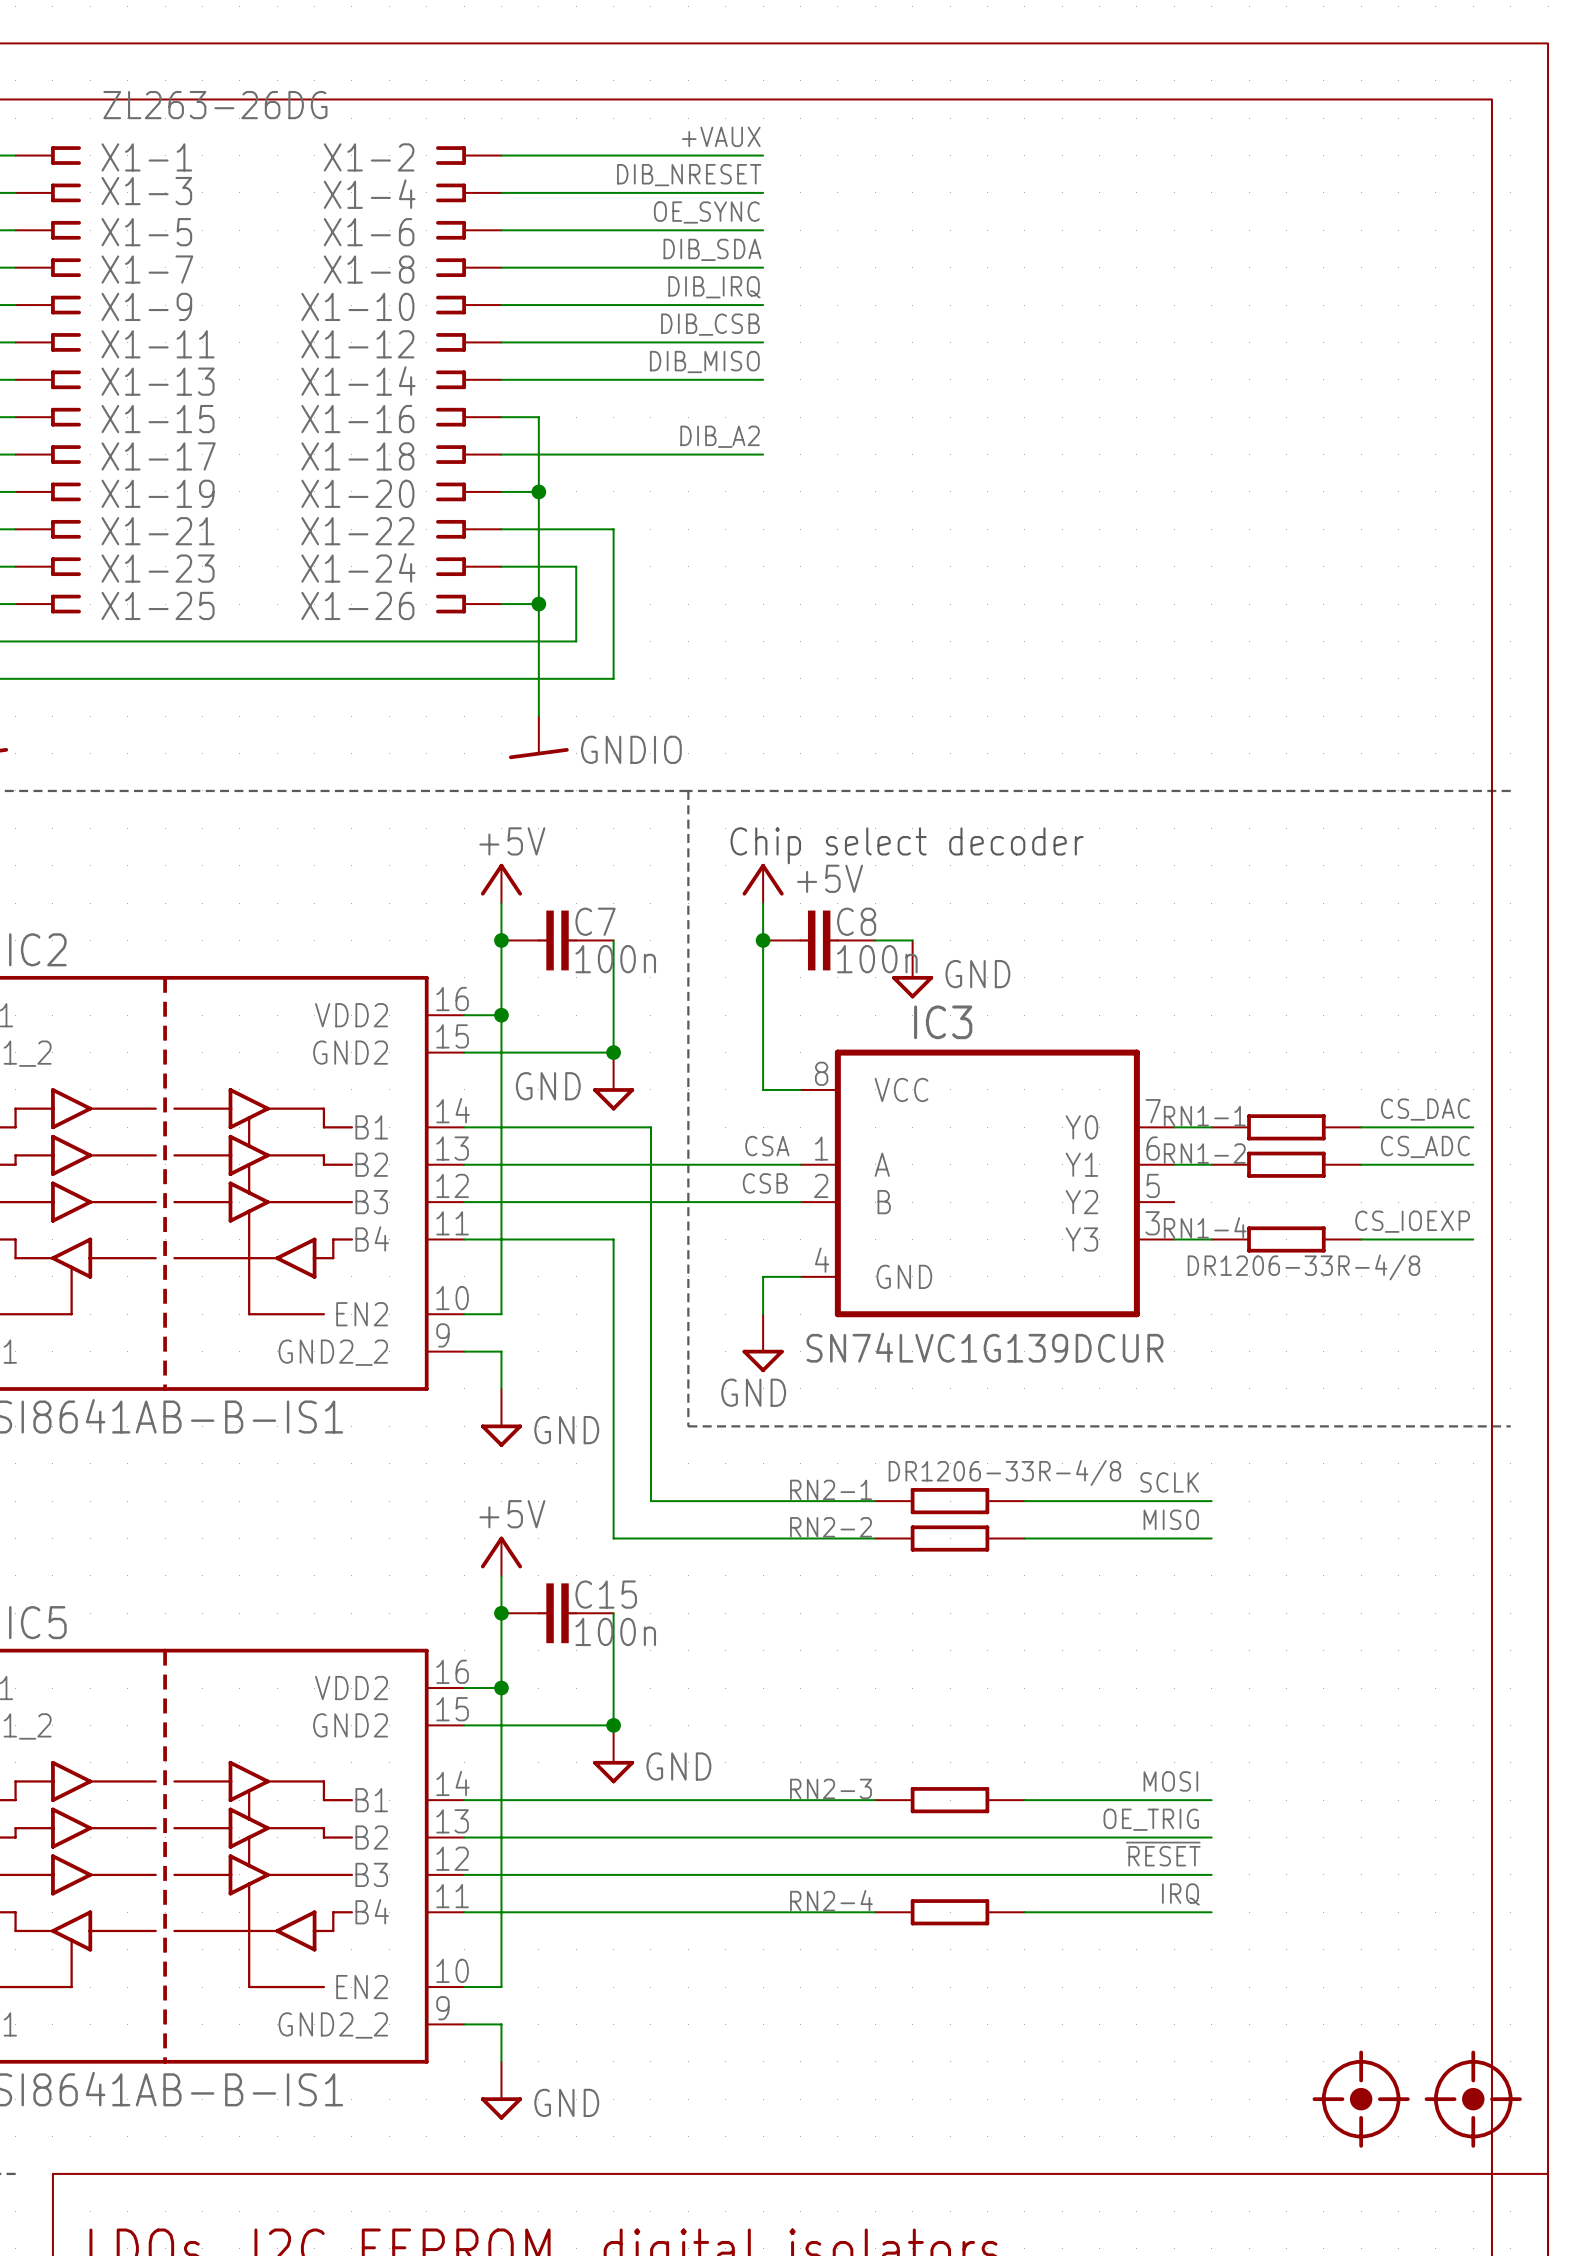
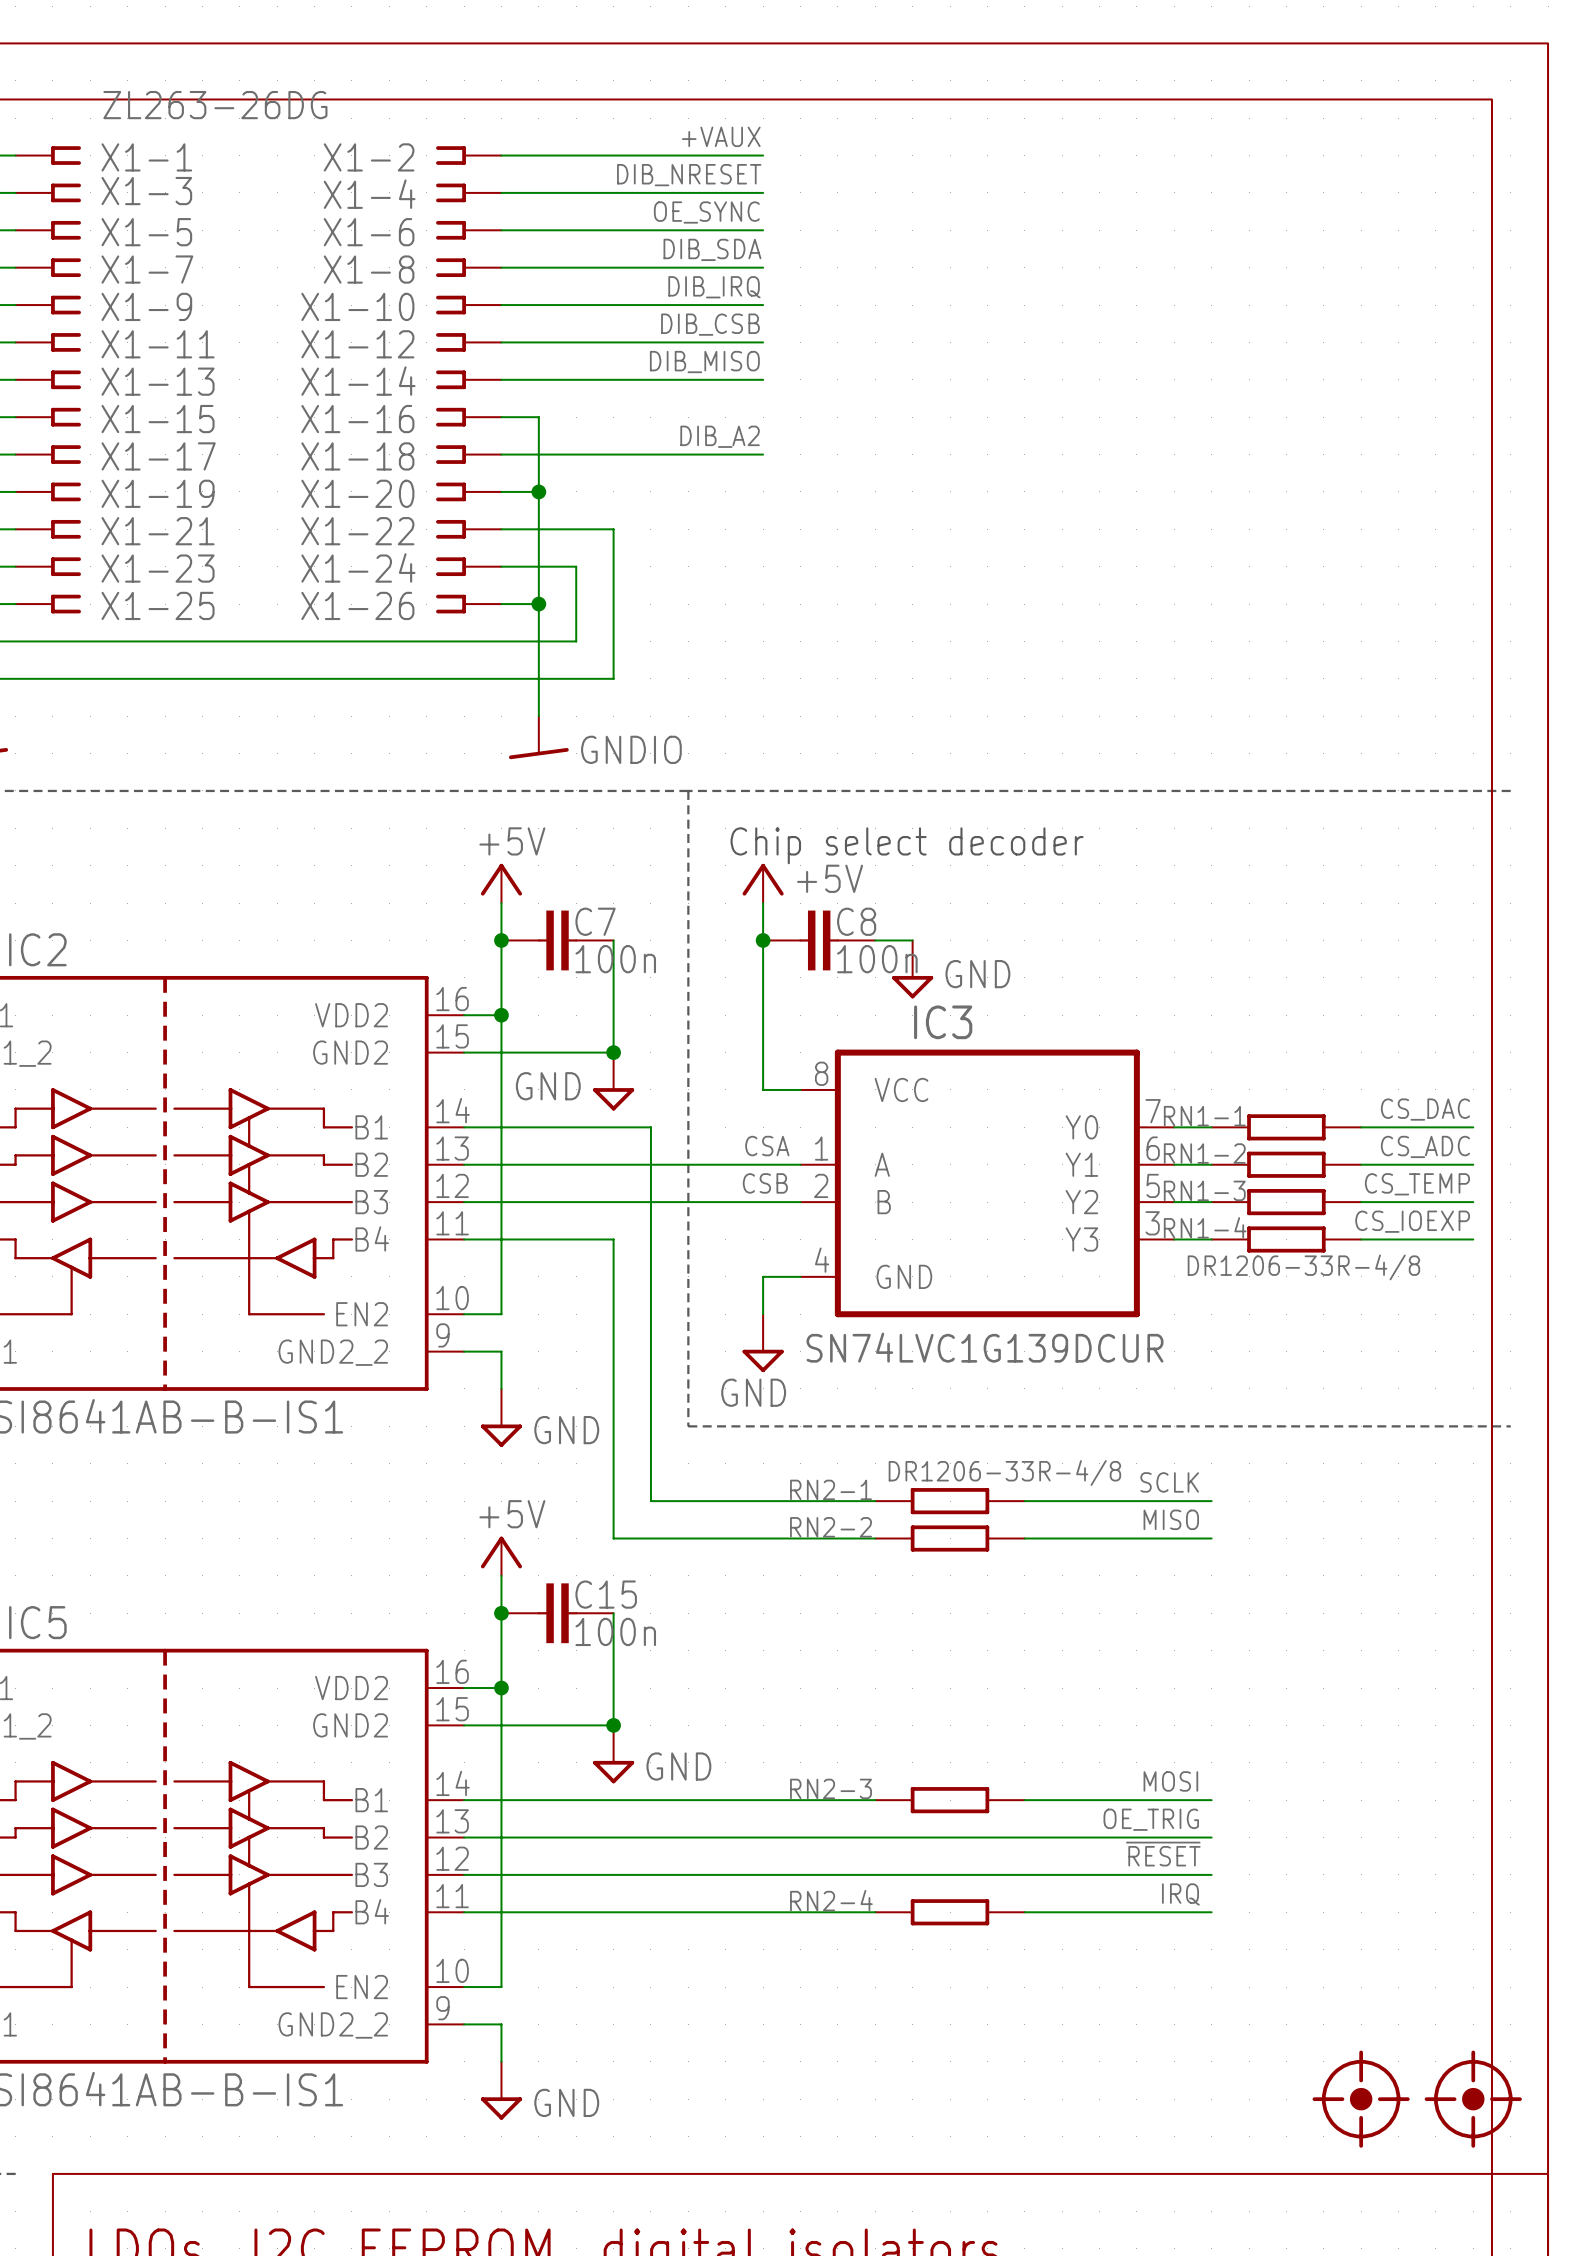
label: none -> CS_TEMP (1417, 1184)
wire: none -> (1174, 1202) (1211, 1202)
RN1-3: none -> (1286, 1202)
wire: none -> (1361, 1202) (1473, 1202)

